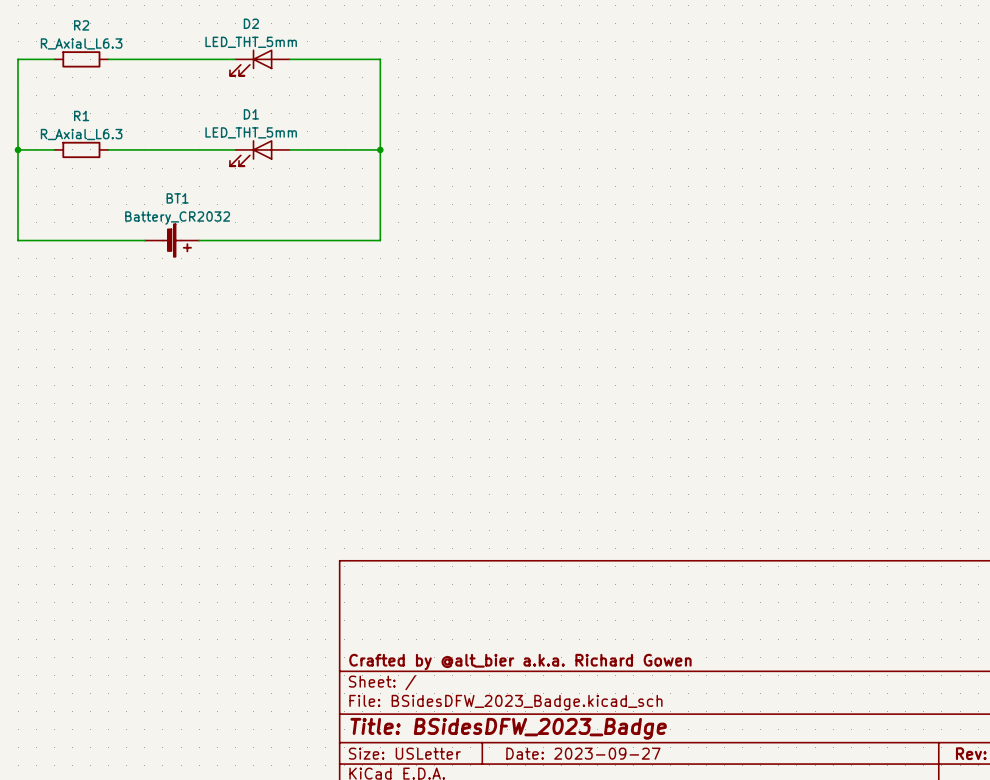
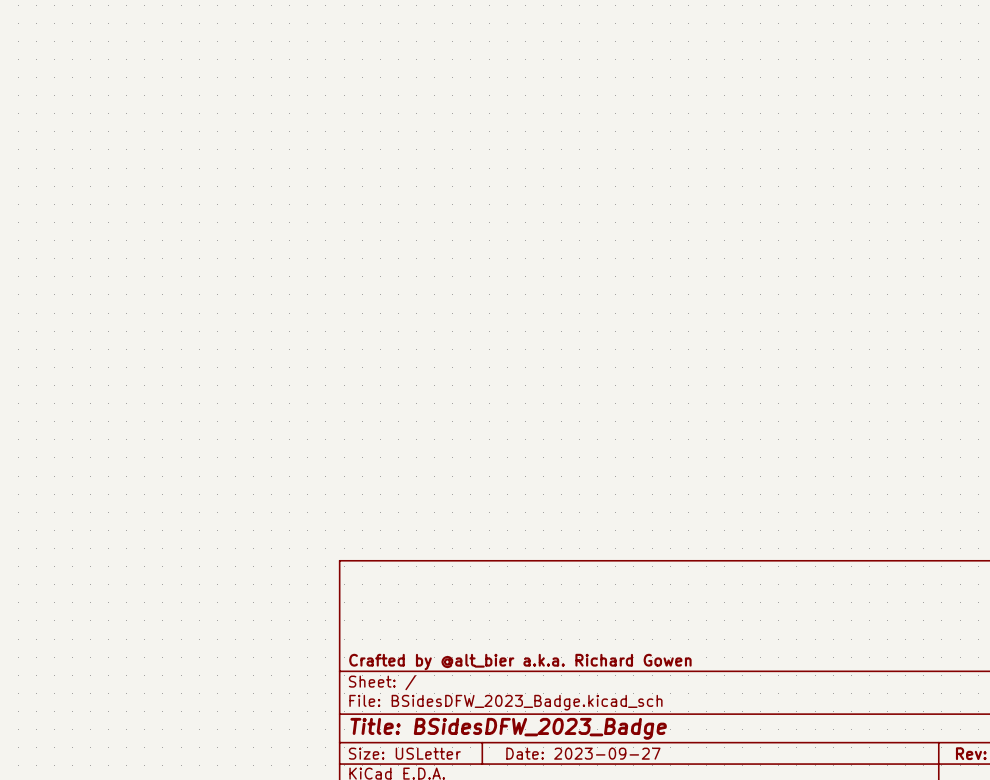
wire: (54, 59) (18, 59) (18, 240) (144, 240) -> none
R2: R_Axial_L6.3 (81, 59) -> none
wire: (108, 59) (235, 59) -> none
wire: (289, 59) (380, 59) (380, 240) (199, 240) -> none
D2: LED_THT_5mm (259, 62) -> none
wire: (18, 149) (54, 149) -> none
junction: (18, 149) -> none
R1: R_Axial_L6.3 (81, 149) -> none
wire: (108, 149) (235, 149) -> none
wire: (289, 149) (380, 149) -> none
junction: (380, 149) -> none
D1: LED_THT_5mm (259, 153) -> none
BT1: Battery_CR2032 (171, 240) -> none

